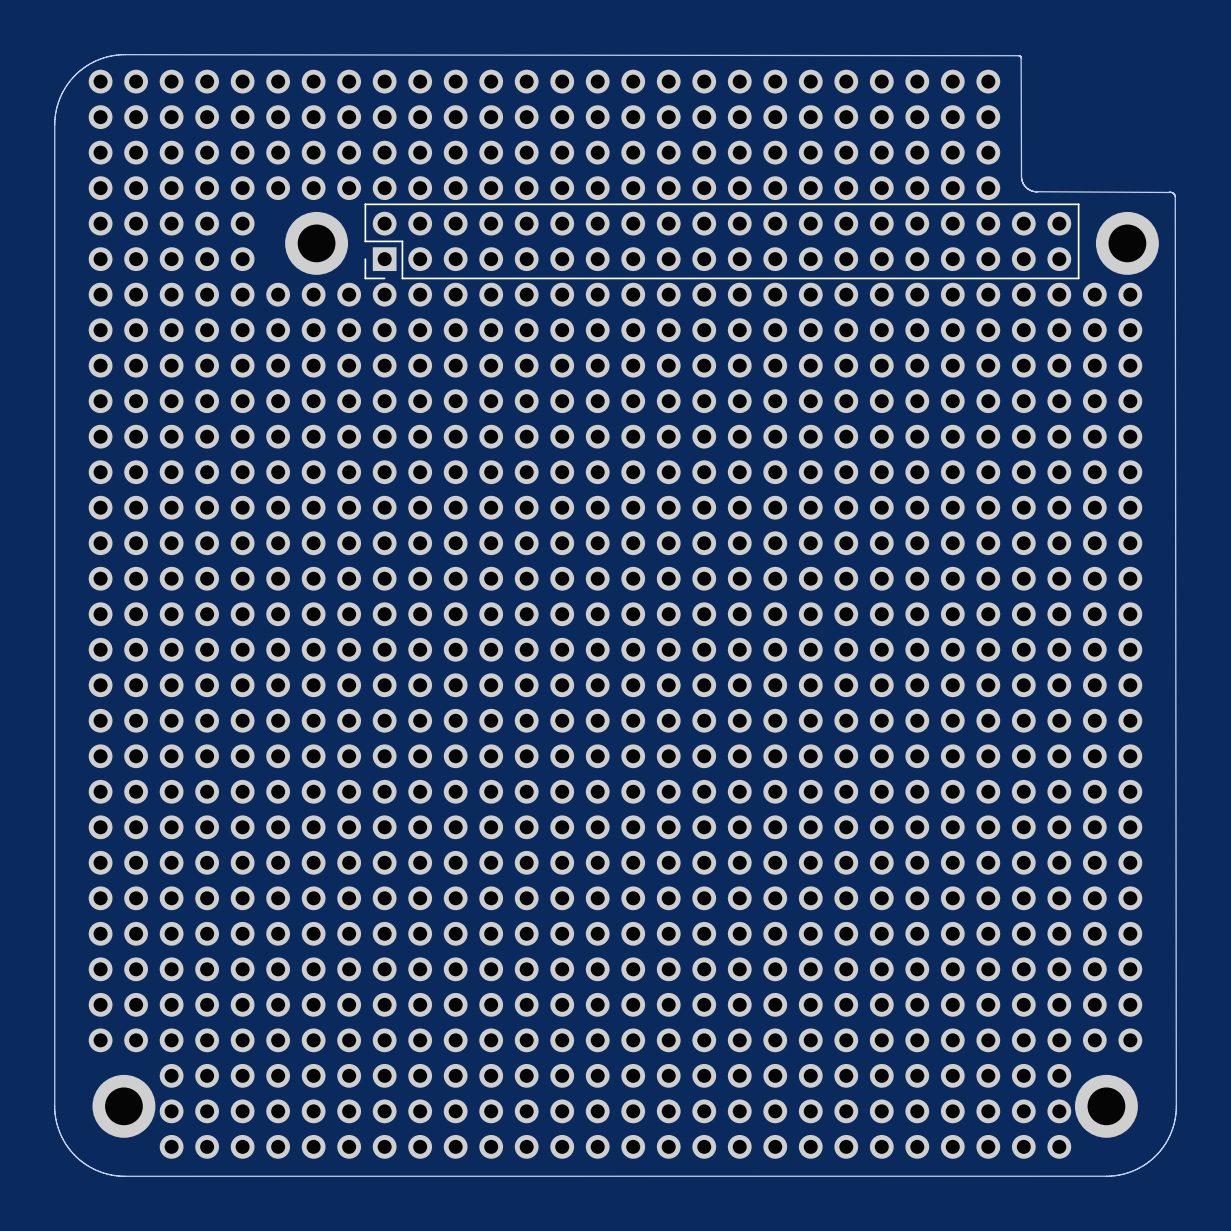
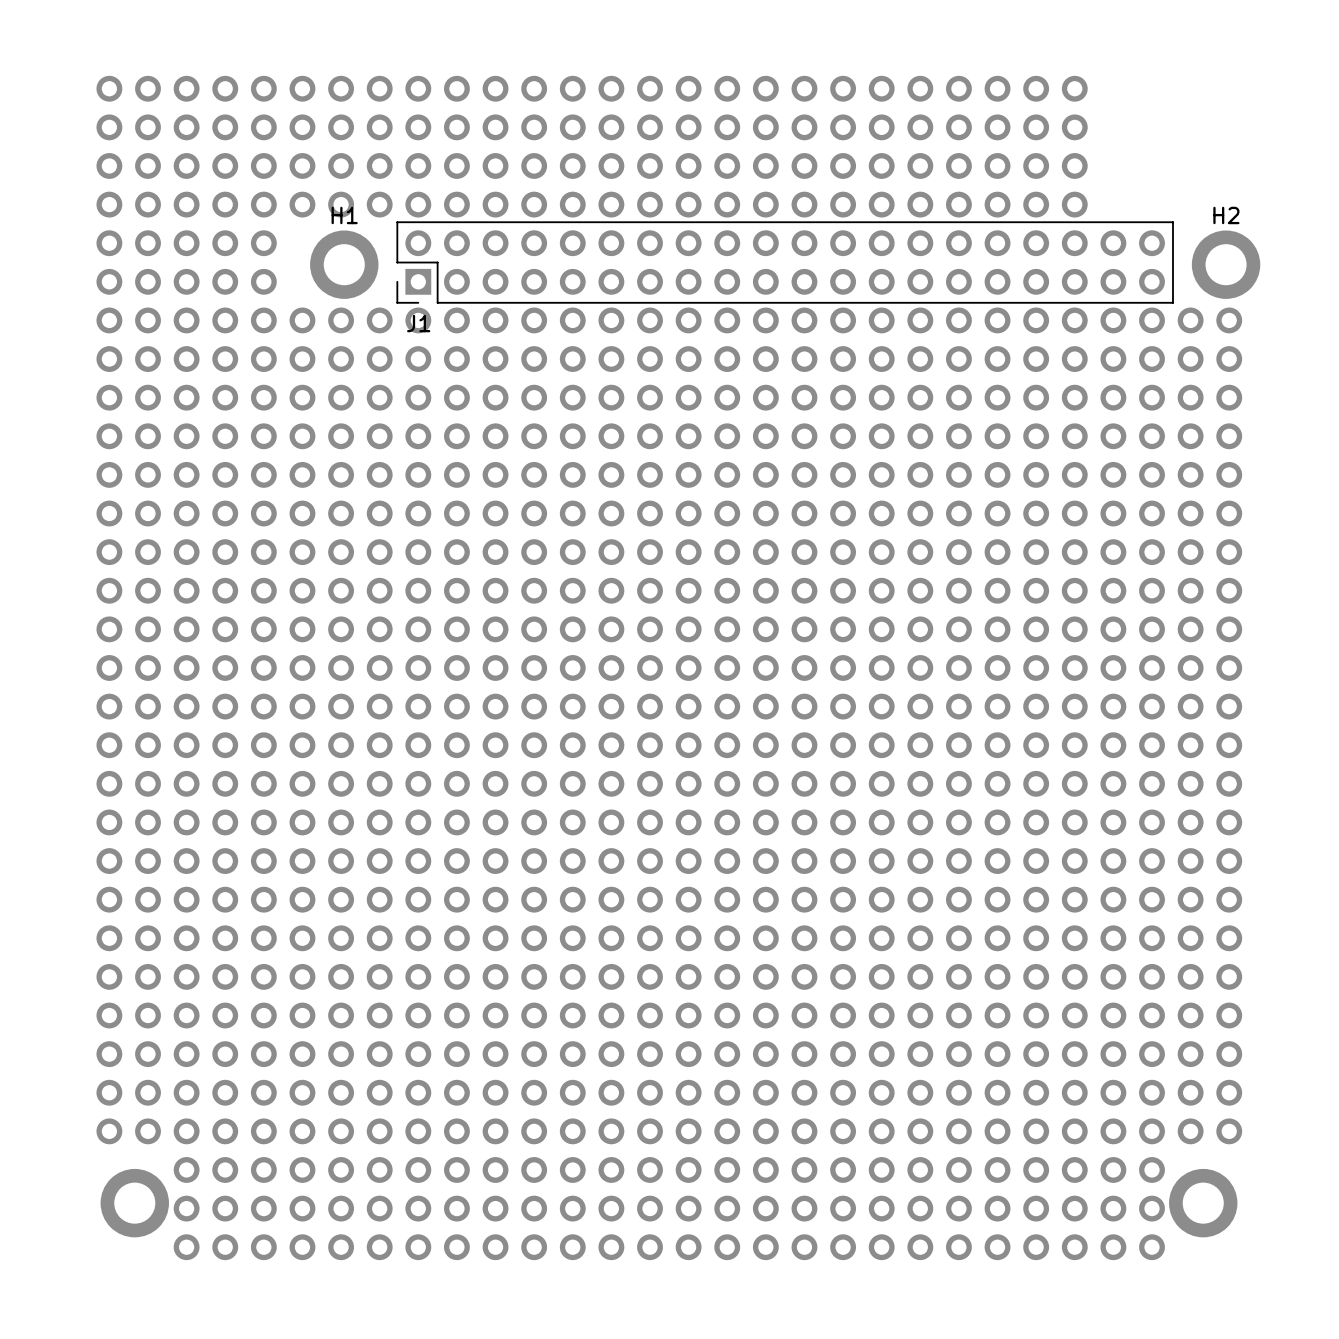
board edge: (1019, 55) (123, 54) (95, 61) (73, 76) (60, 98) (54, 122) (54, 1106) -> none
board edge: (1021, 57) (1021, 177) (1026, 187) (1036, 191) (1168, 192) -> none
board edge: (1175, 196) (1176, 1108) (1174, 1123) (1169, 1137) (1160, 1150) (1150, 1160) (1129, 1172) (1108, 1176) (121, 1176) (95, 1169) (74, 1155) (59, 1132) (54, 1106) -> none
H1 name: none -> H1 (344, 215)
H2 name: none -> H2 (1226, 215)
J1 name: none -> J1 (418, 323)

